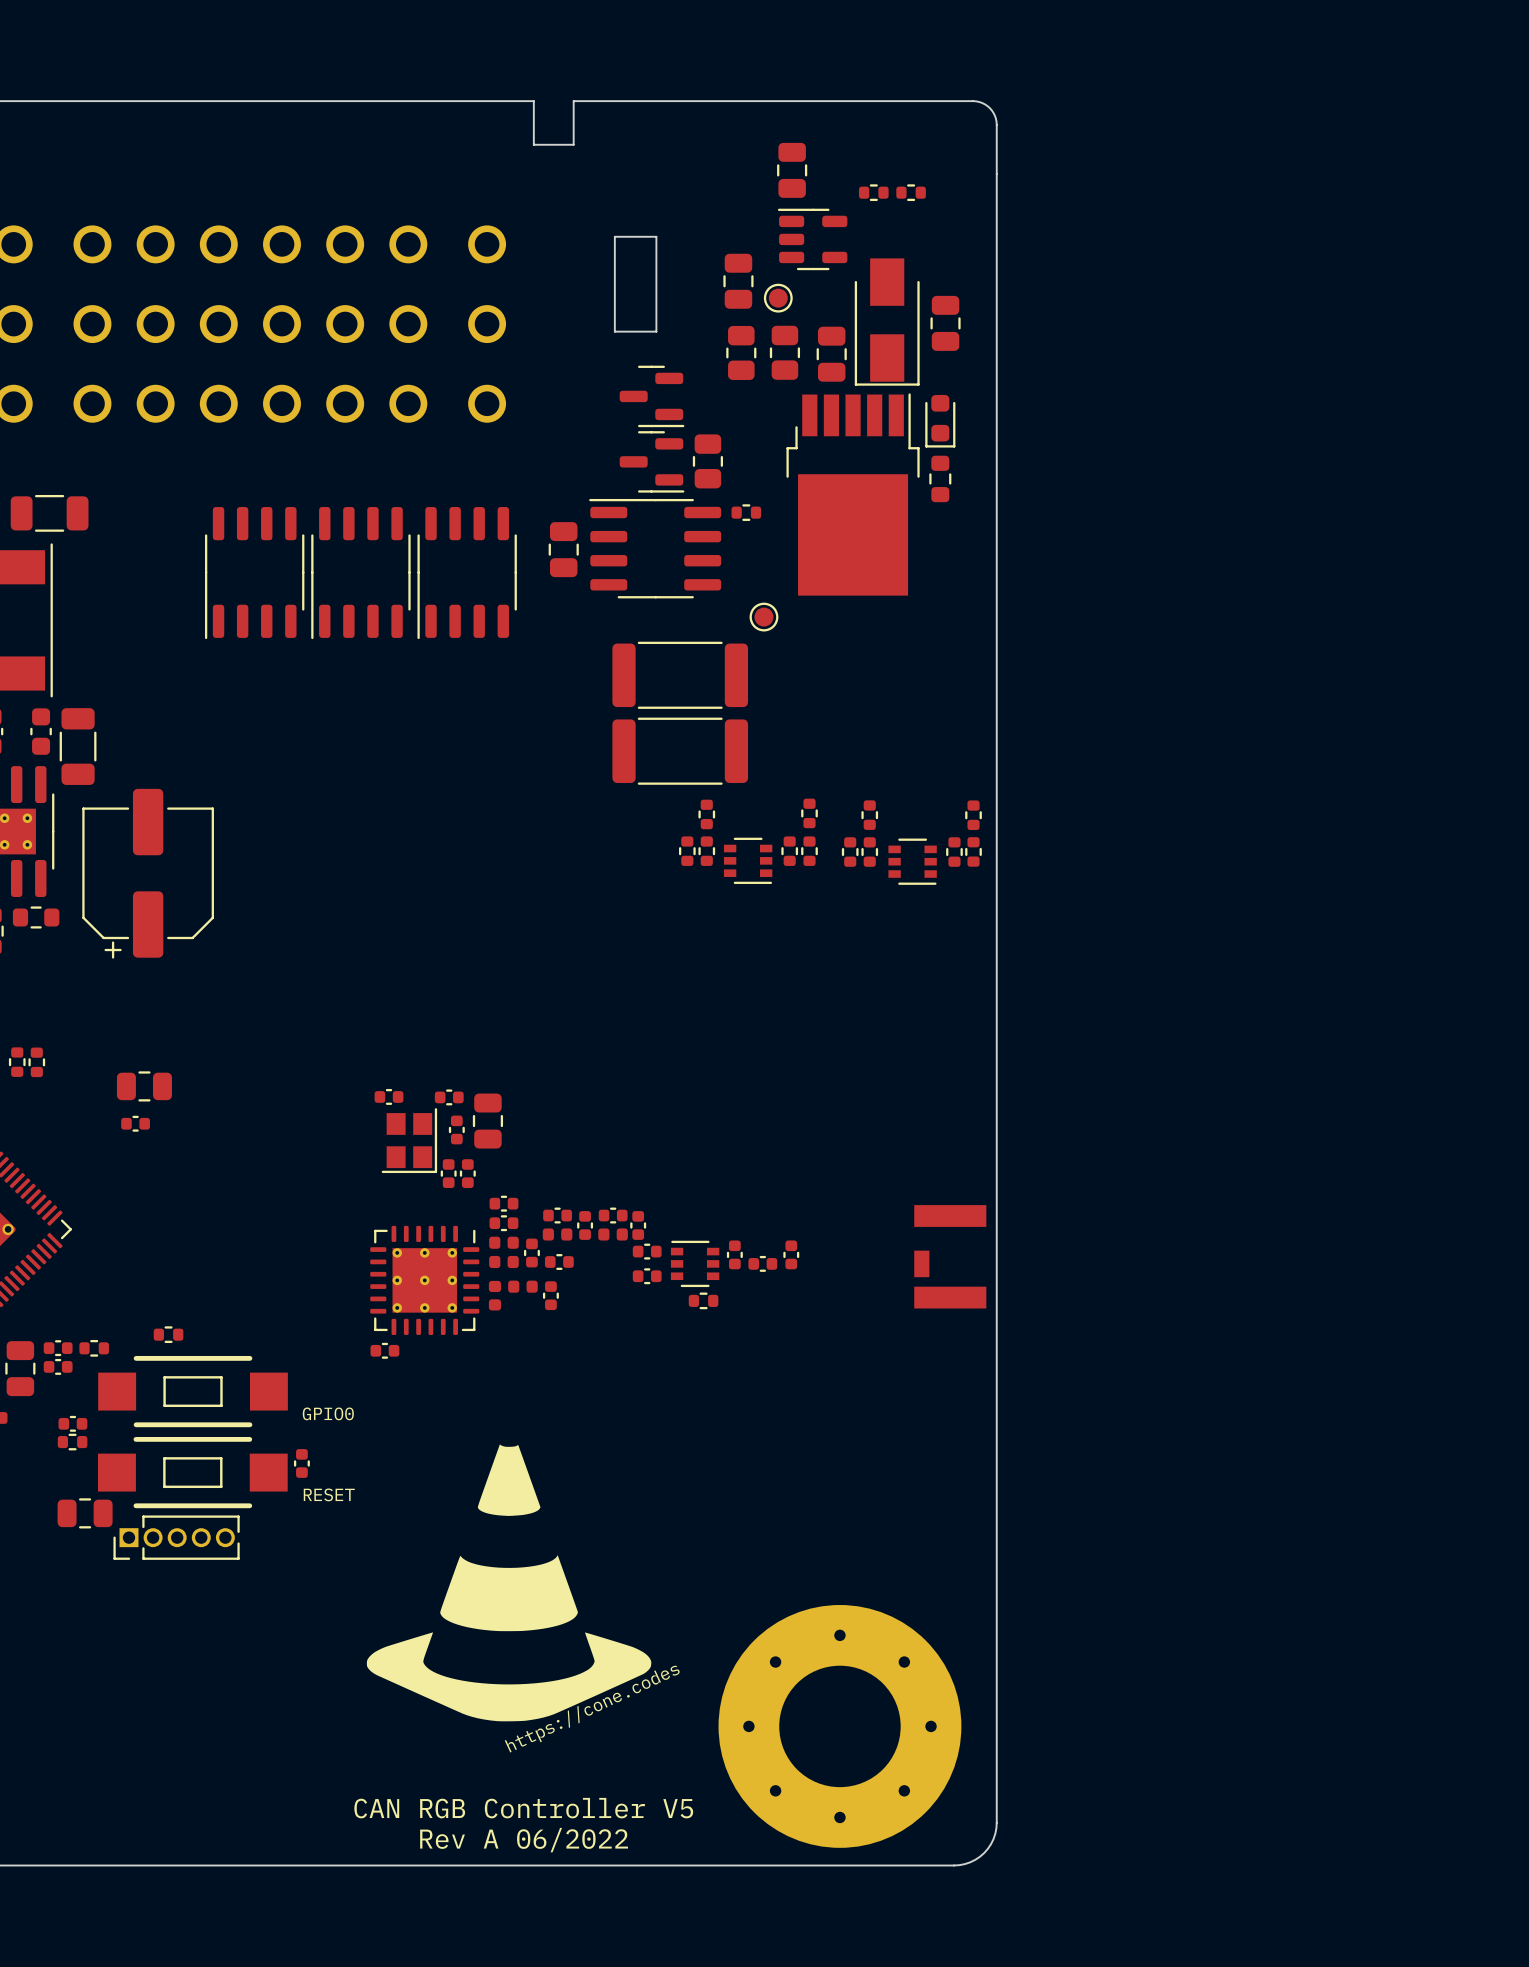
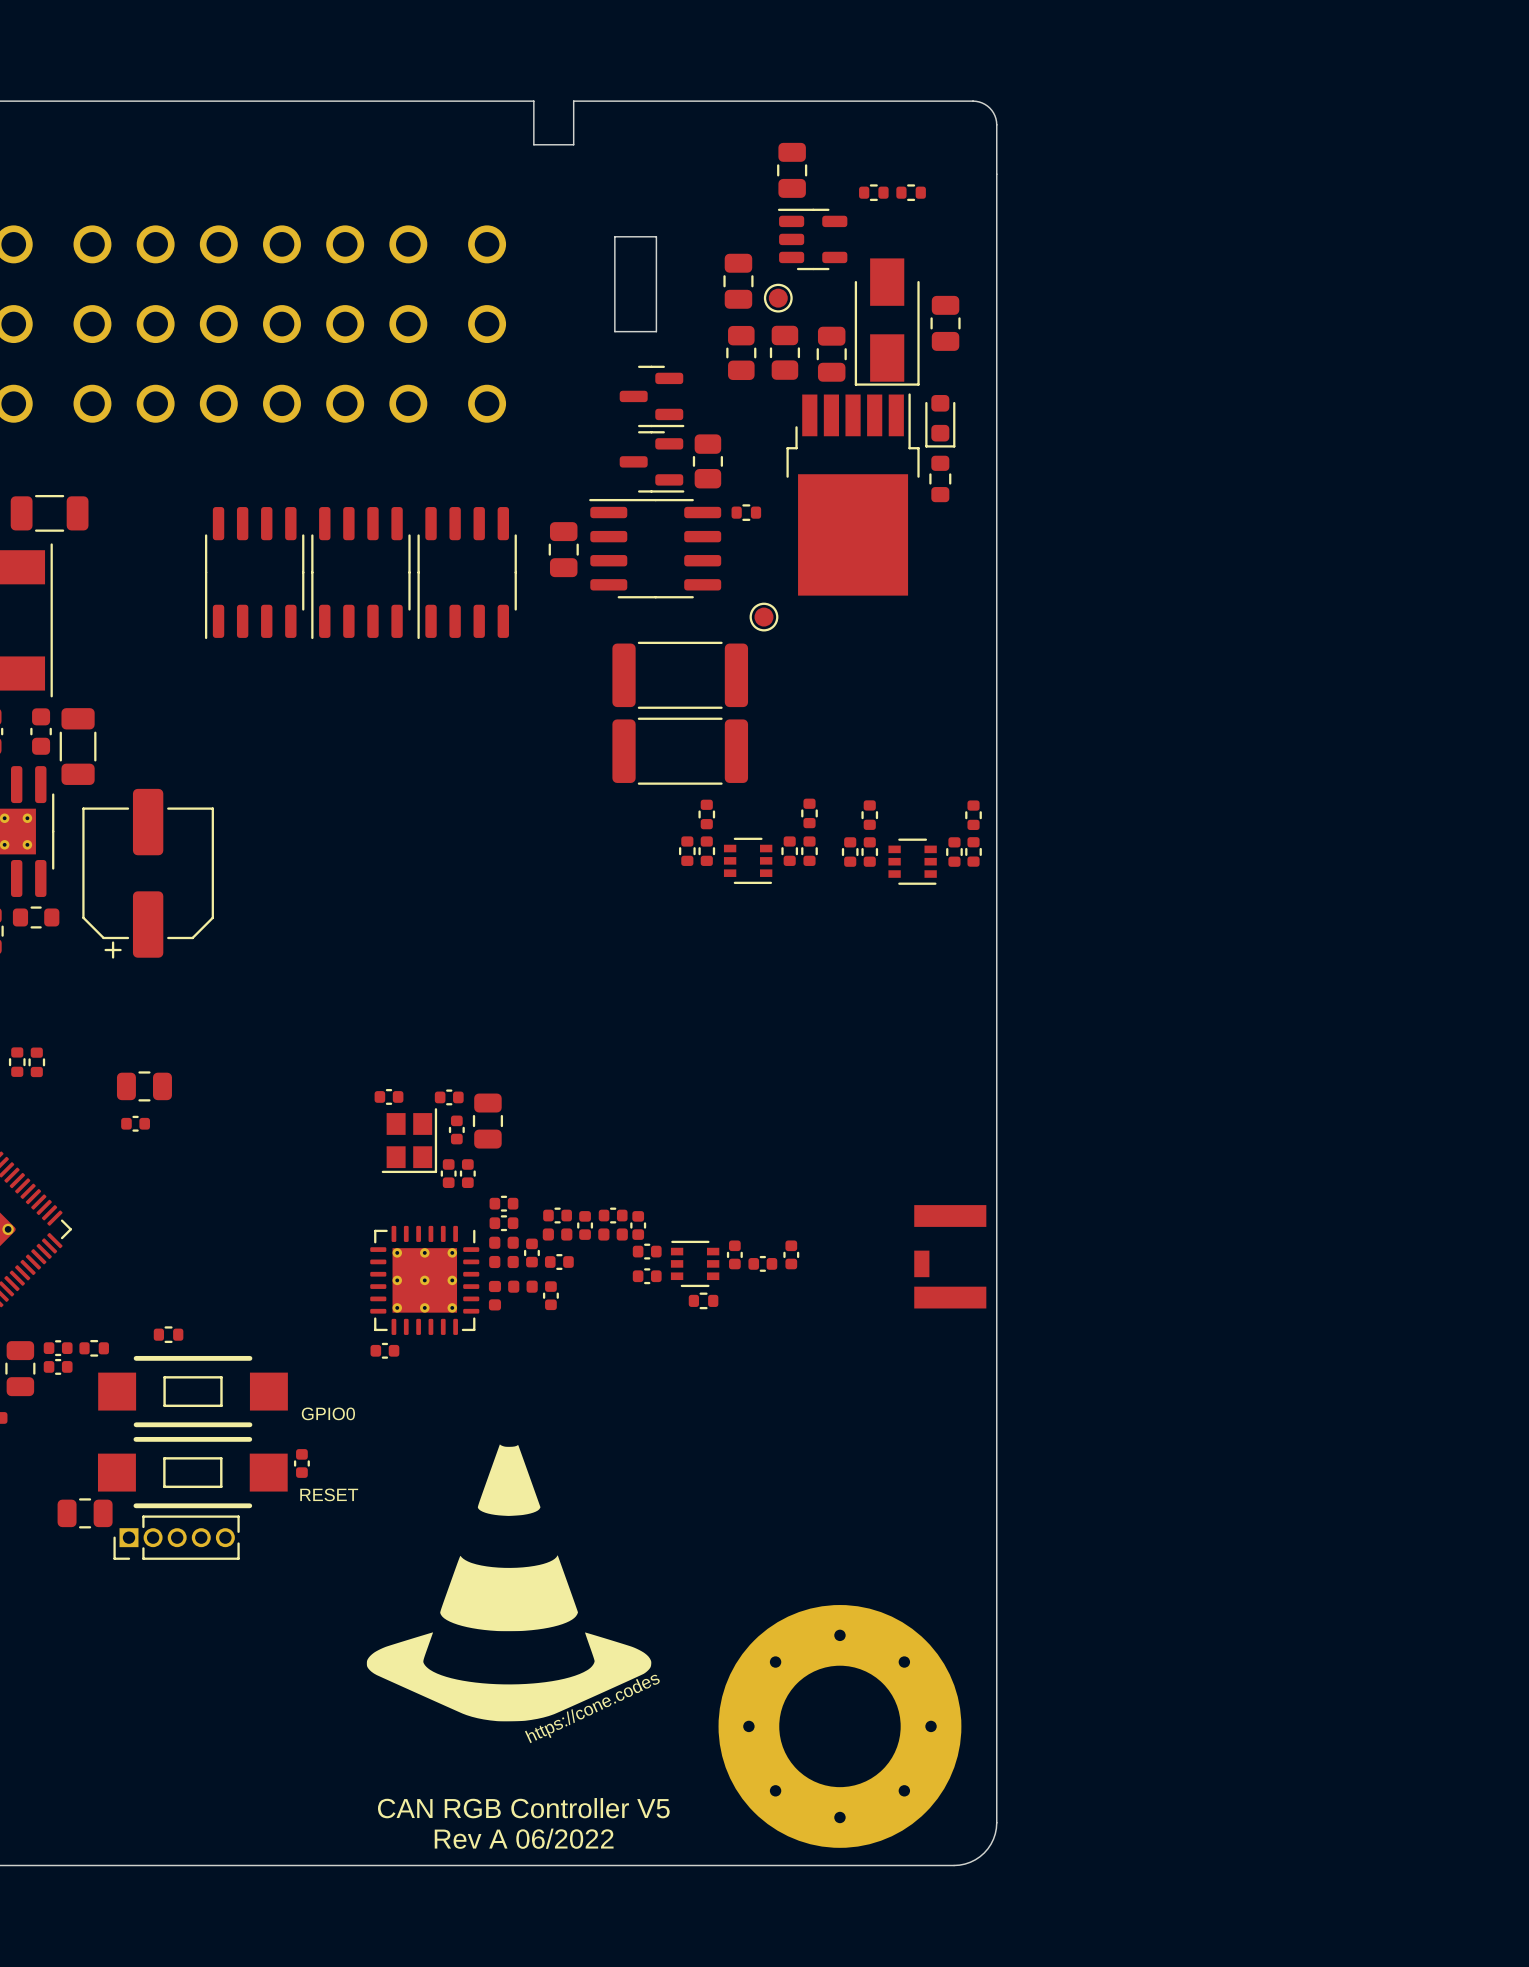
part: (72, 1423) -> none
part: (72, 1442) -> none

